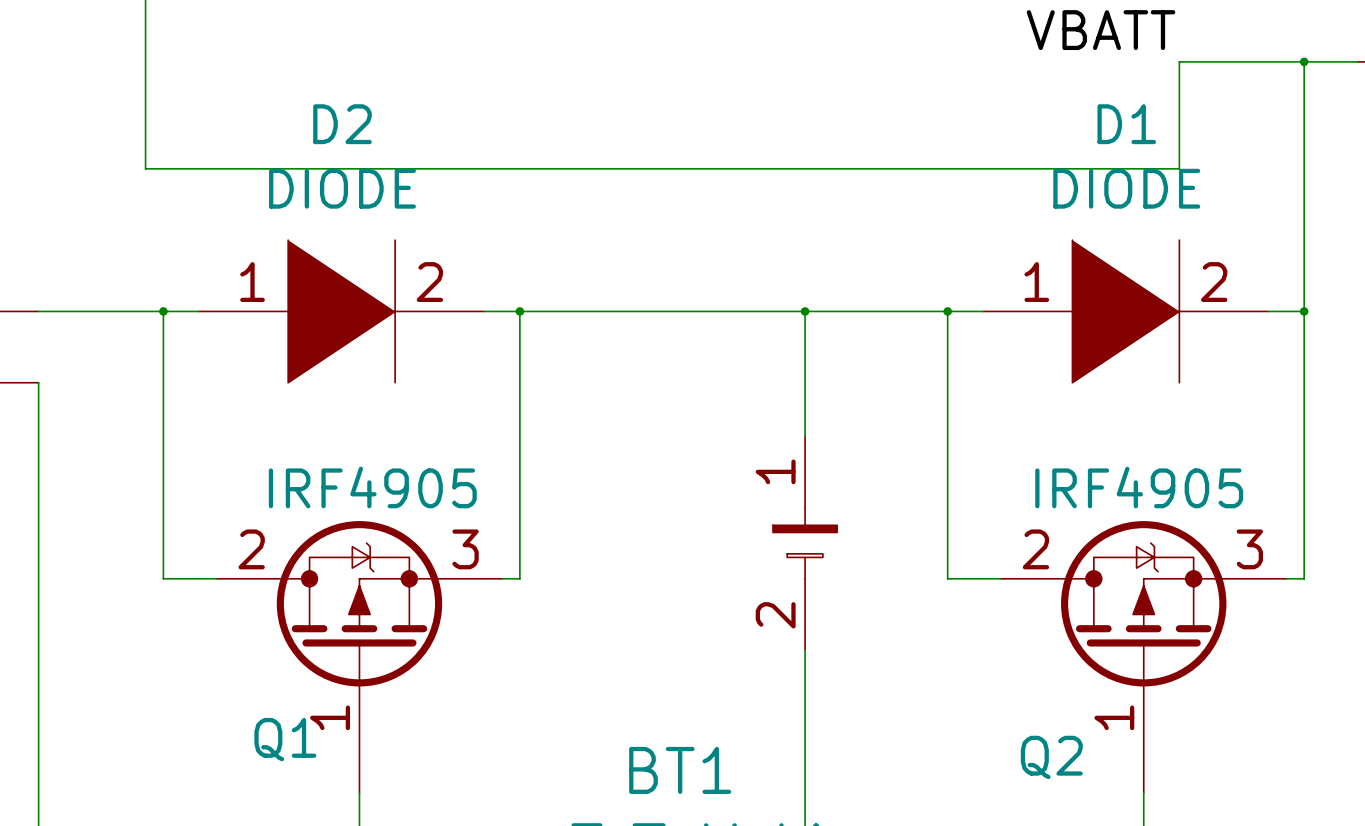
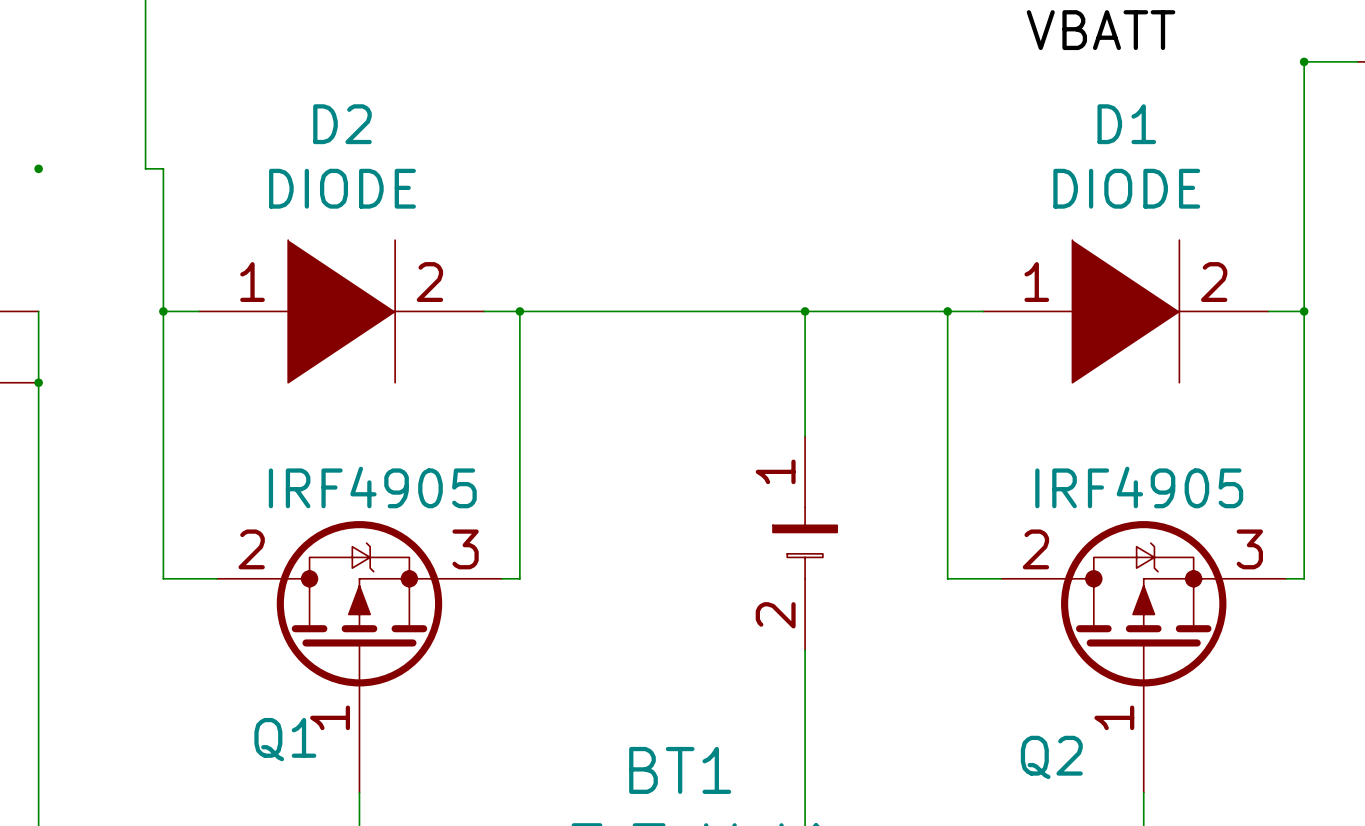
wire: (1304, 61) (1179, 61) (1179, 168) (163, 168) -> (163, 311) (163, 168)
junction: none -> (38, 168)
wire: (38, 311) (163, 311) -> (38, 311) (38, 382)
junction: none -> (38, 382)

